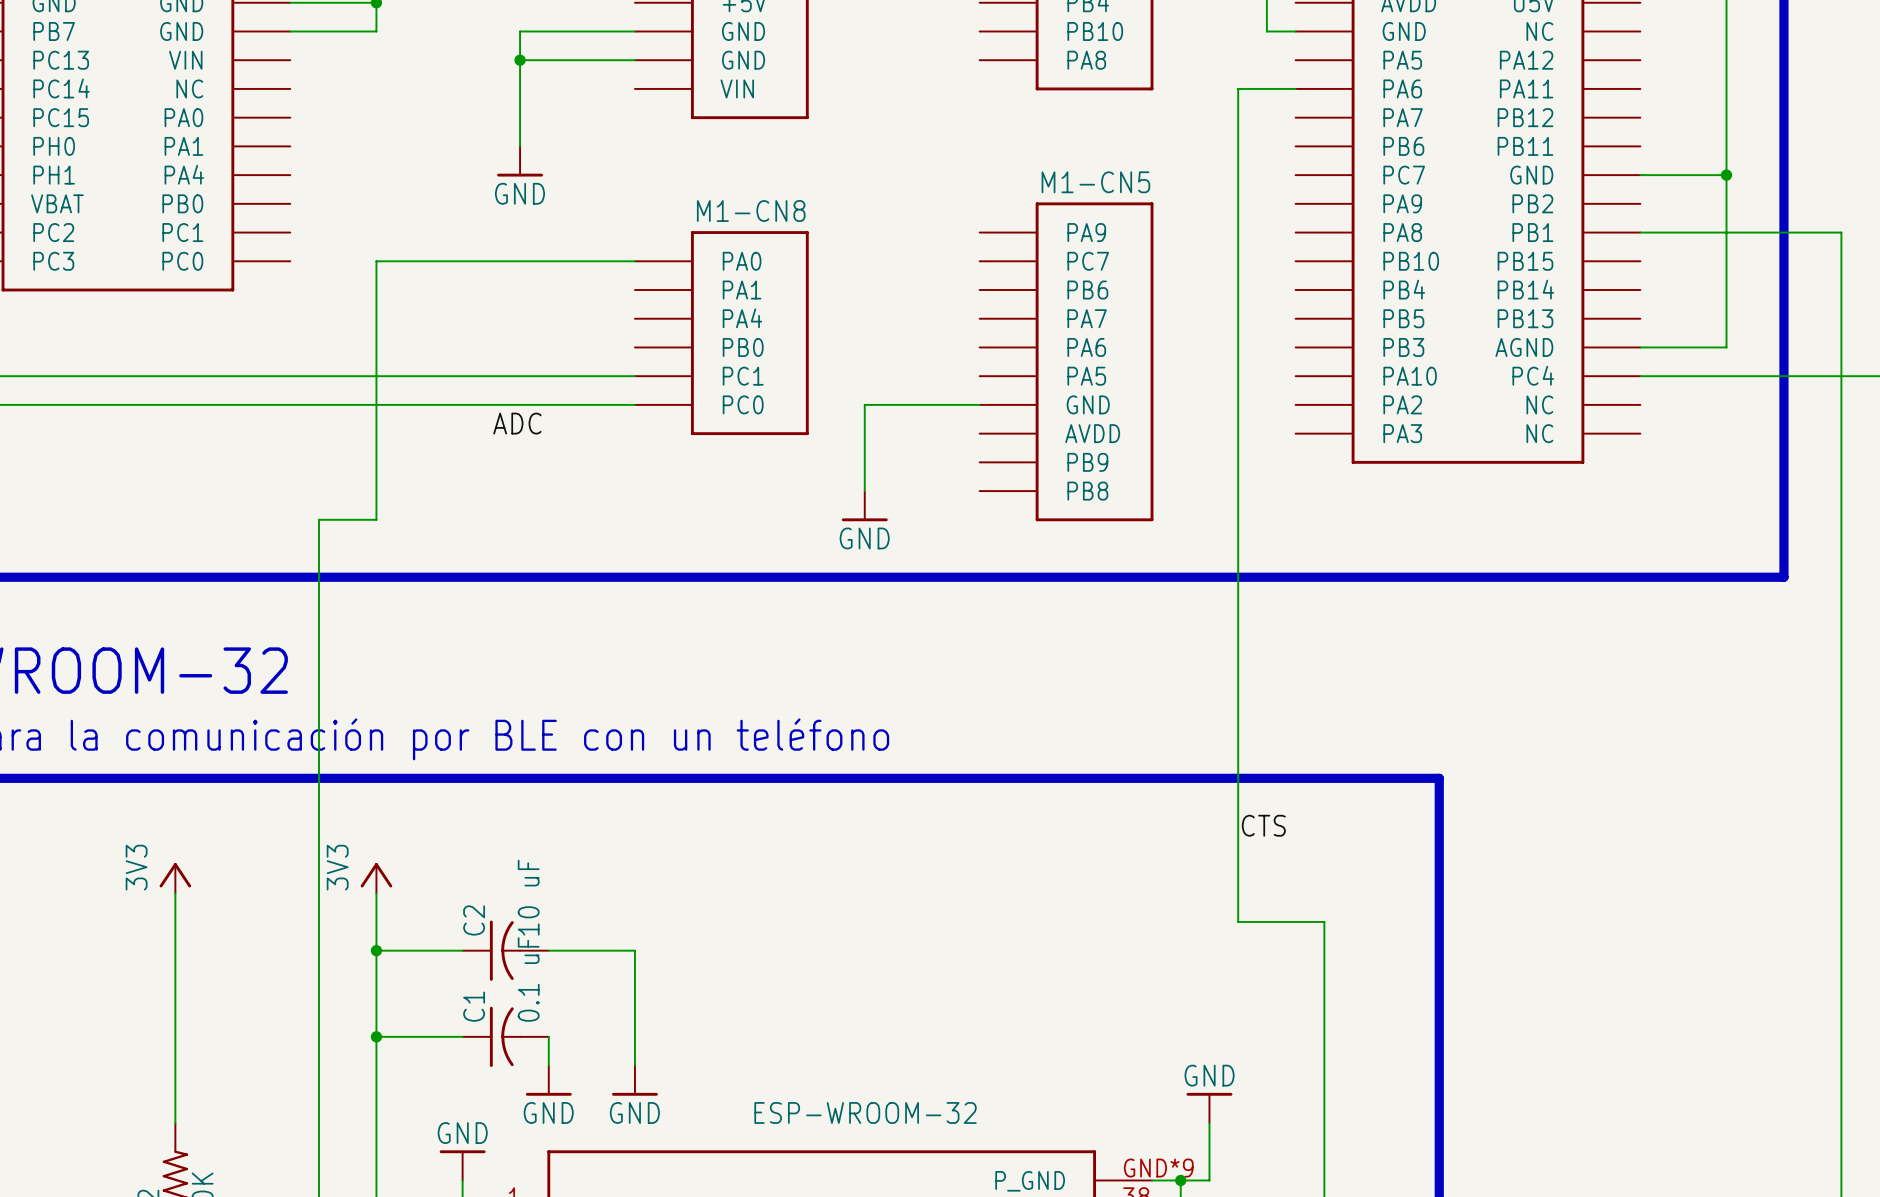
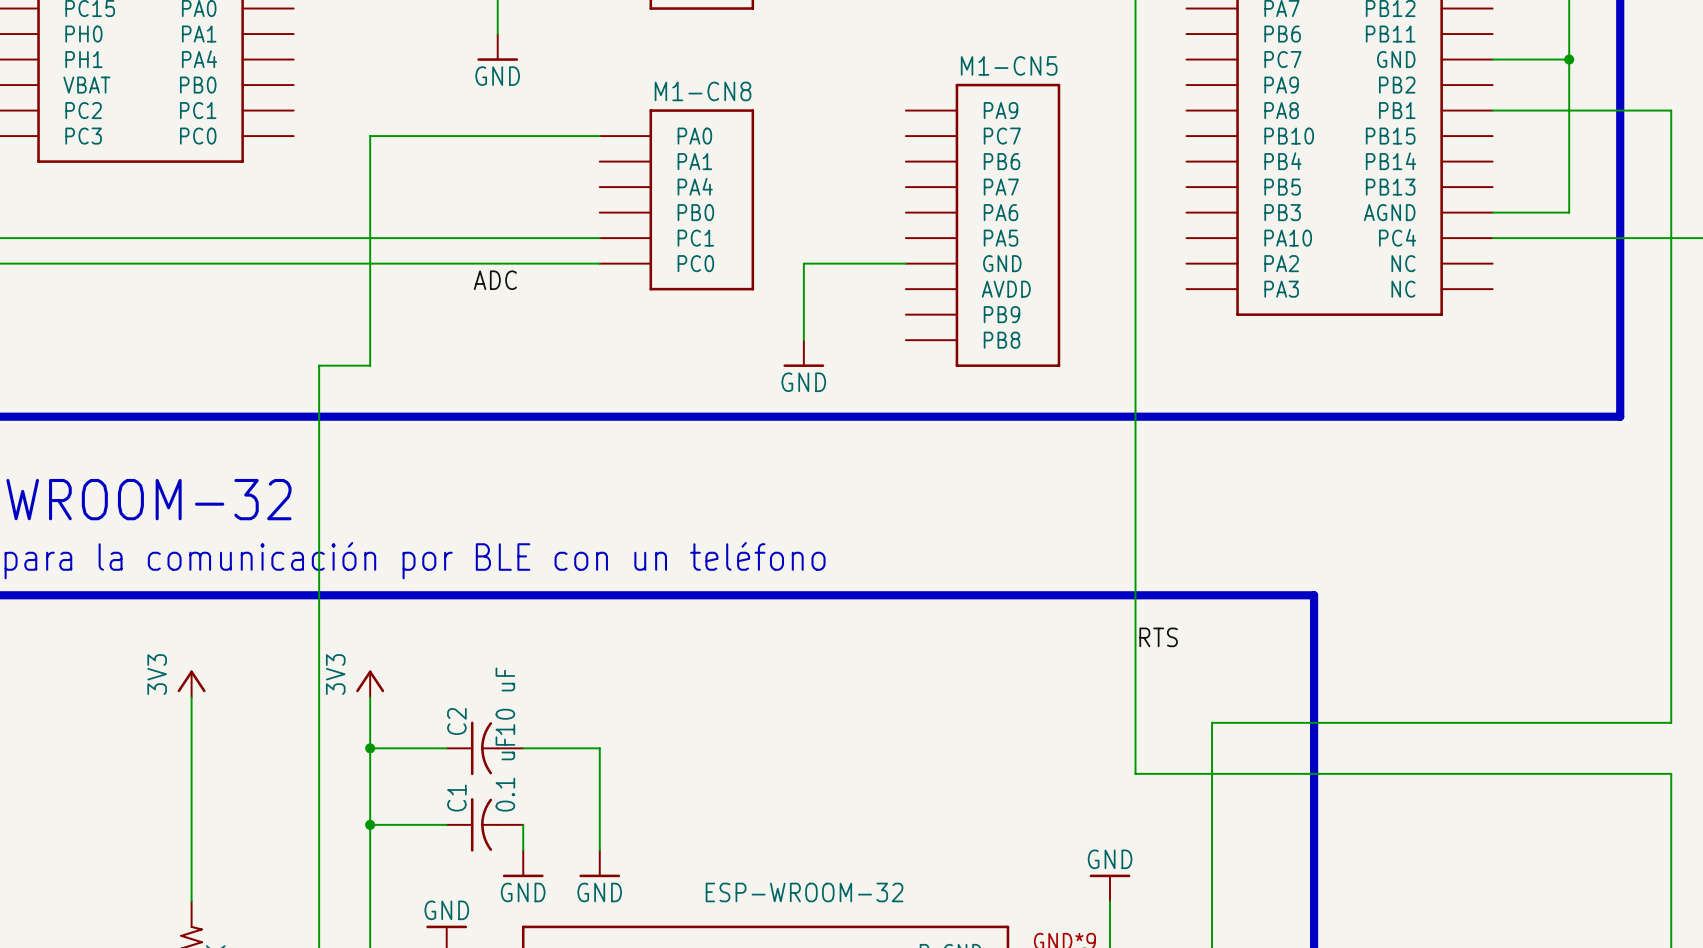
label: CTS (1263, 825) -> RTS (1158, 637)
wire: (1238, 921) (1324, 921) -> (1135, 722) (1135, 773) (1671, 773)
wire: (1841, 921) (1841, 979) -> (1671, 722) (1212, 722)

